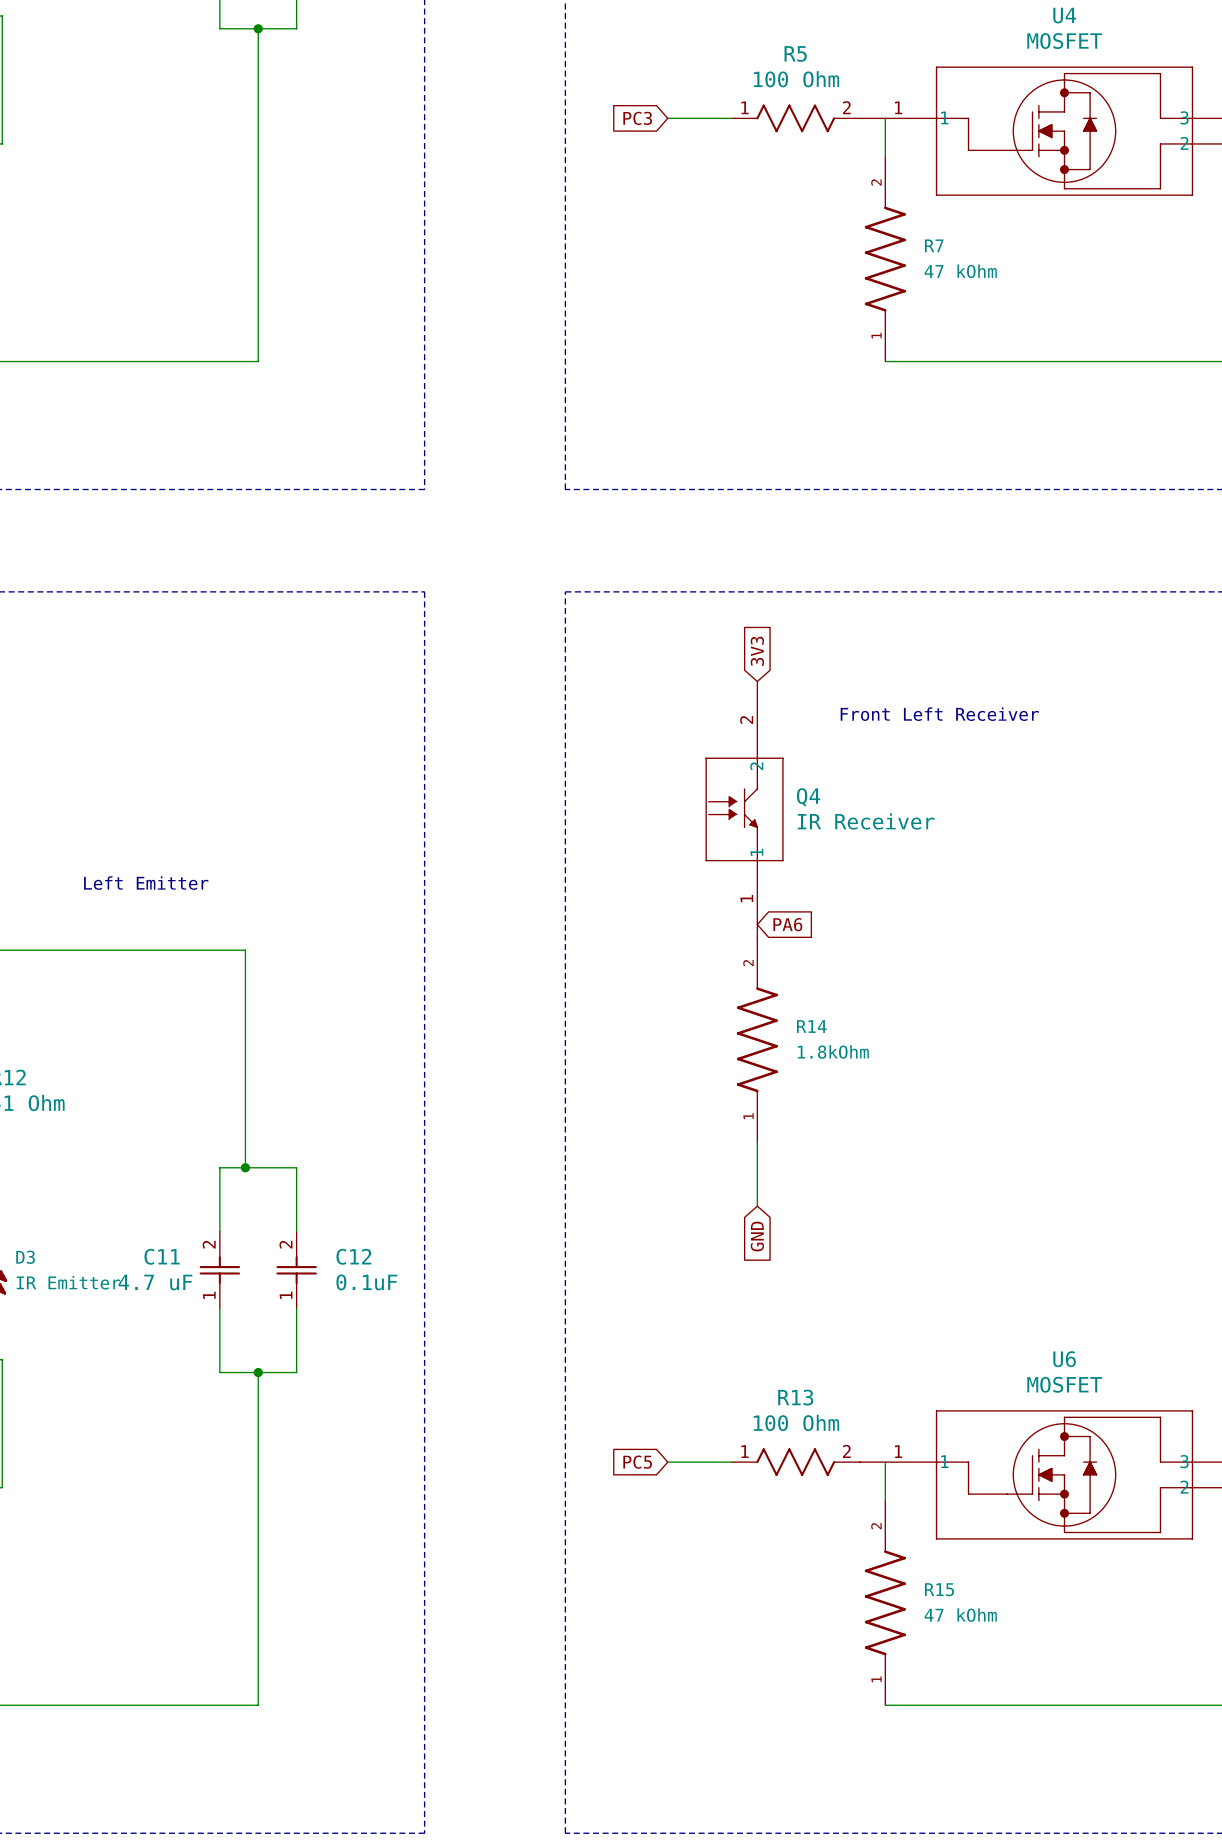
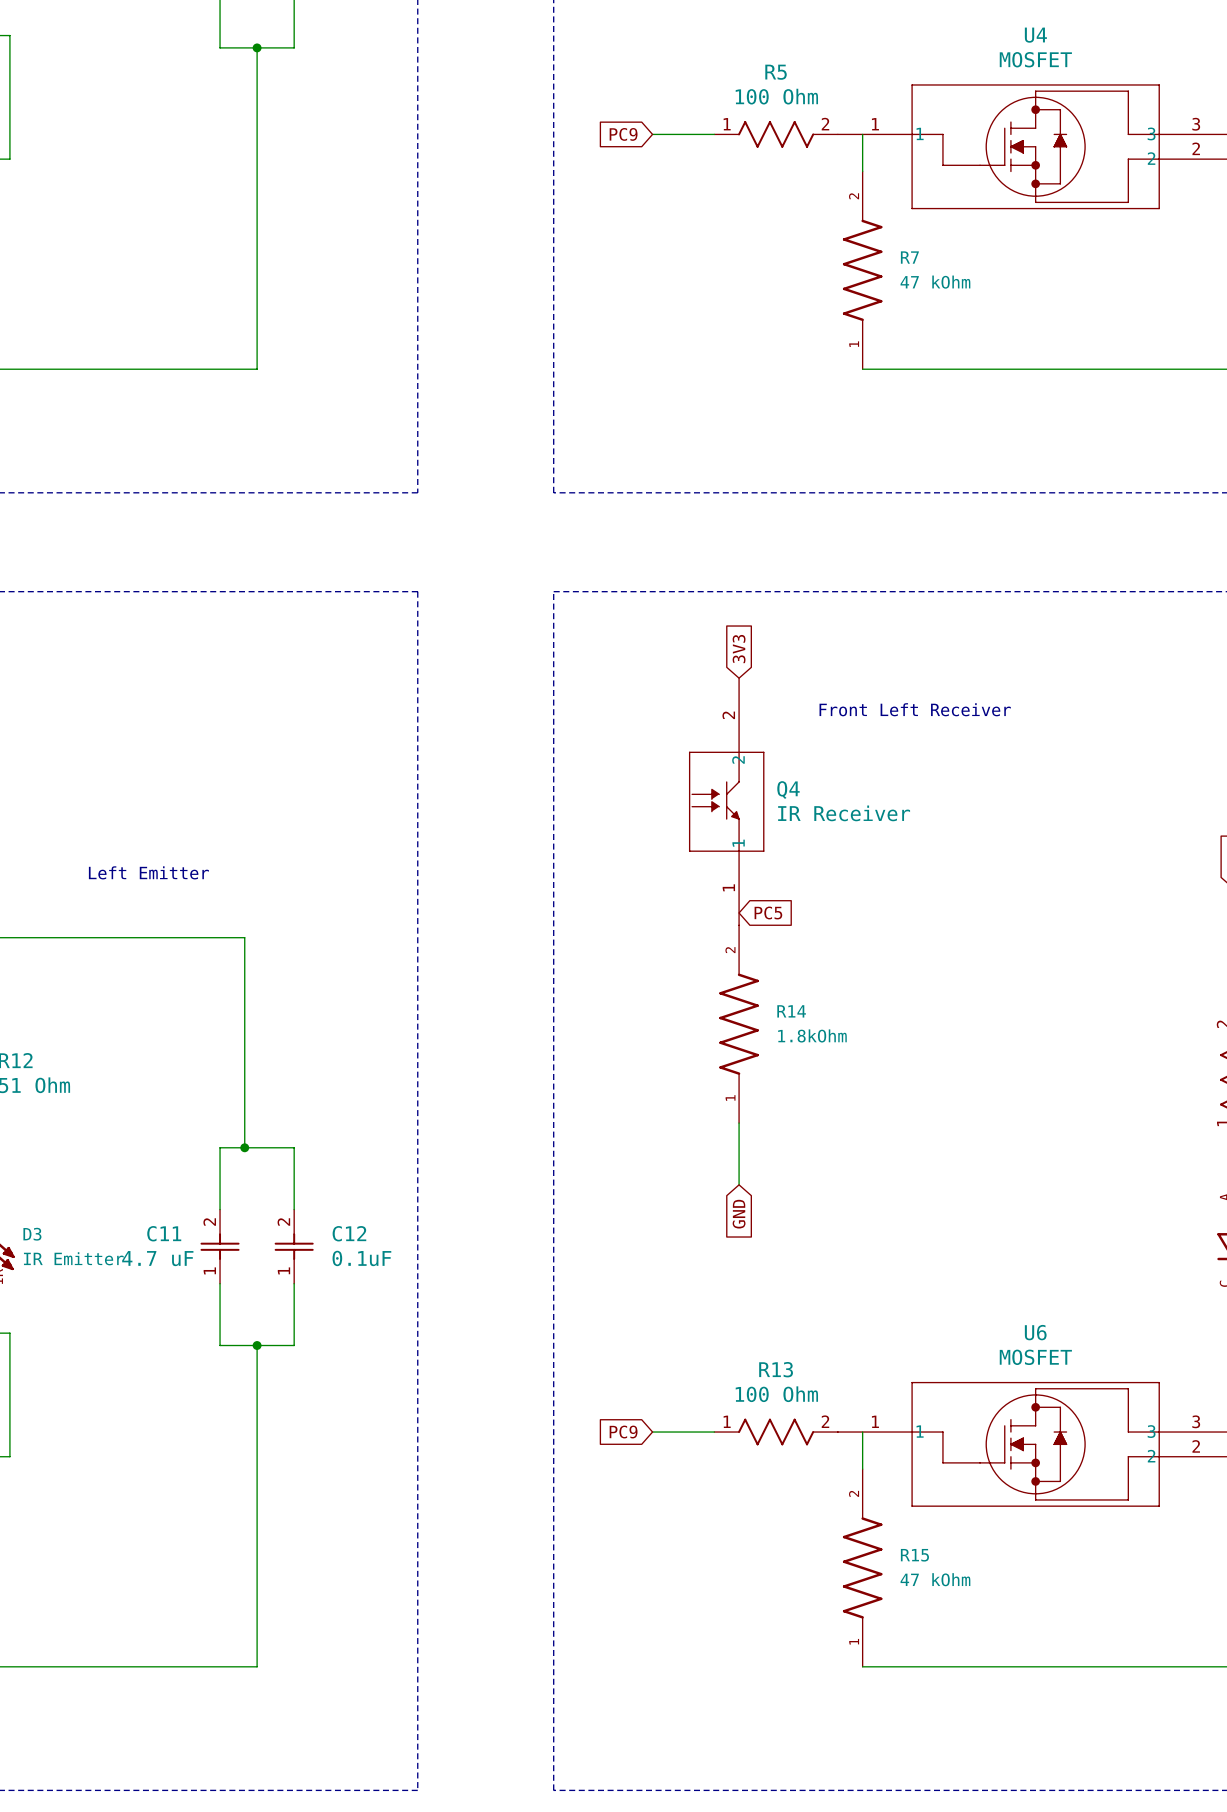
global label: PC3 (637, 118) -> PC9 (623, 134)
global label: PA6 (787, 924) -> PC5 (768, 912)
global label: PC5 (637, 1462) -> PC9 (623, 1432)

